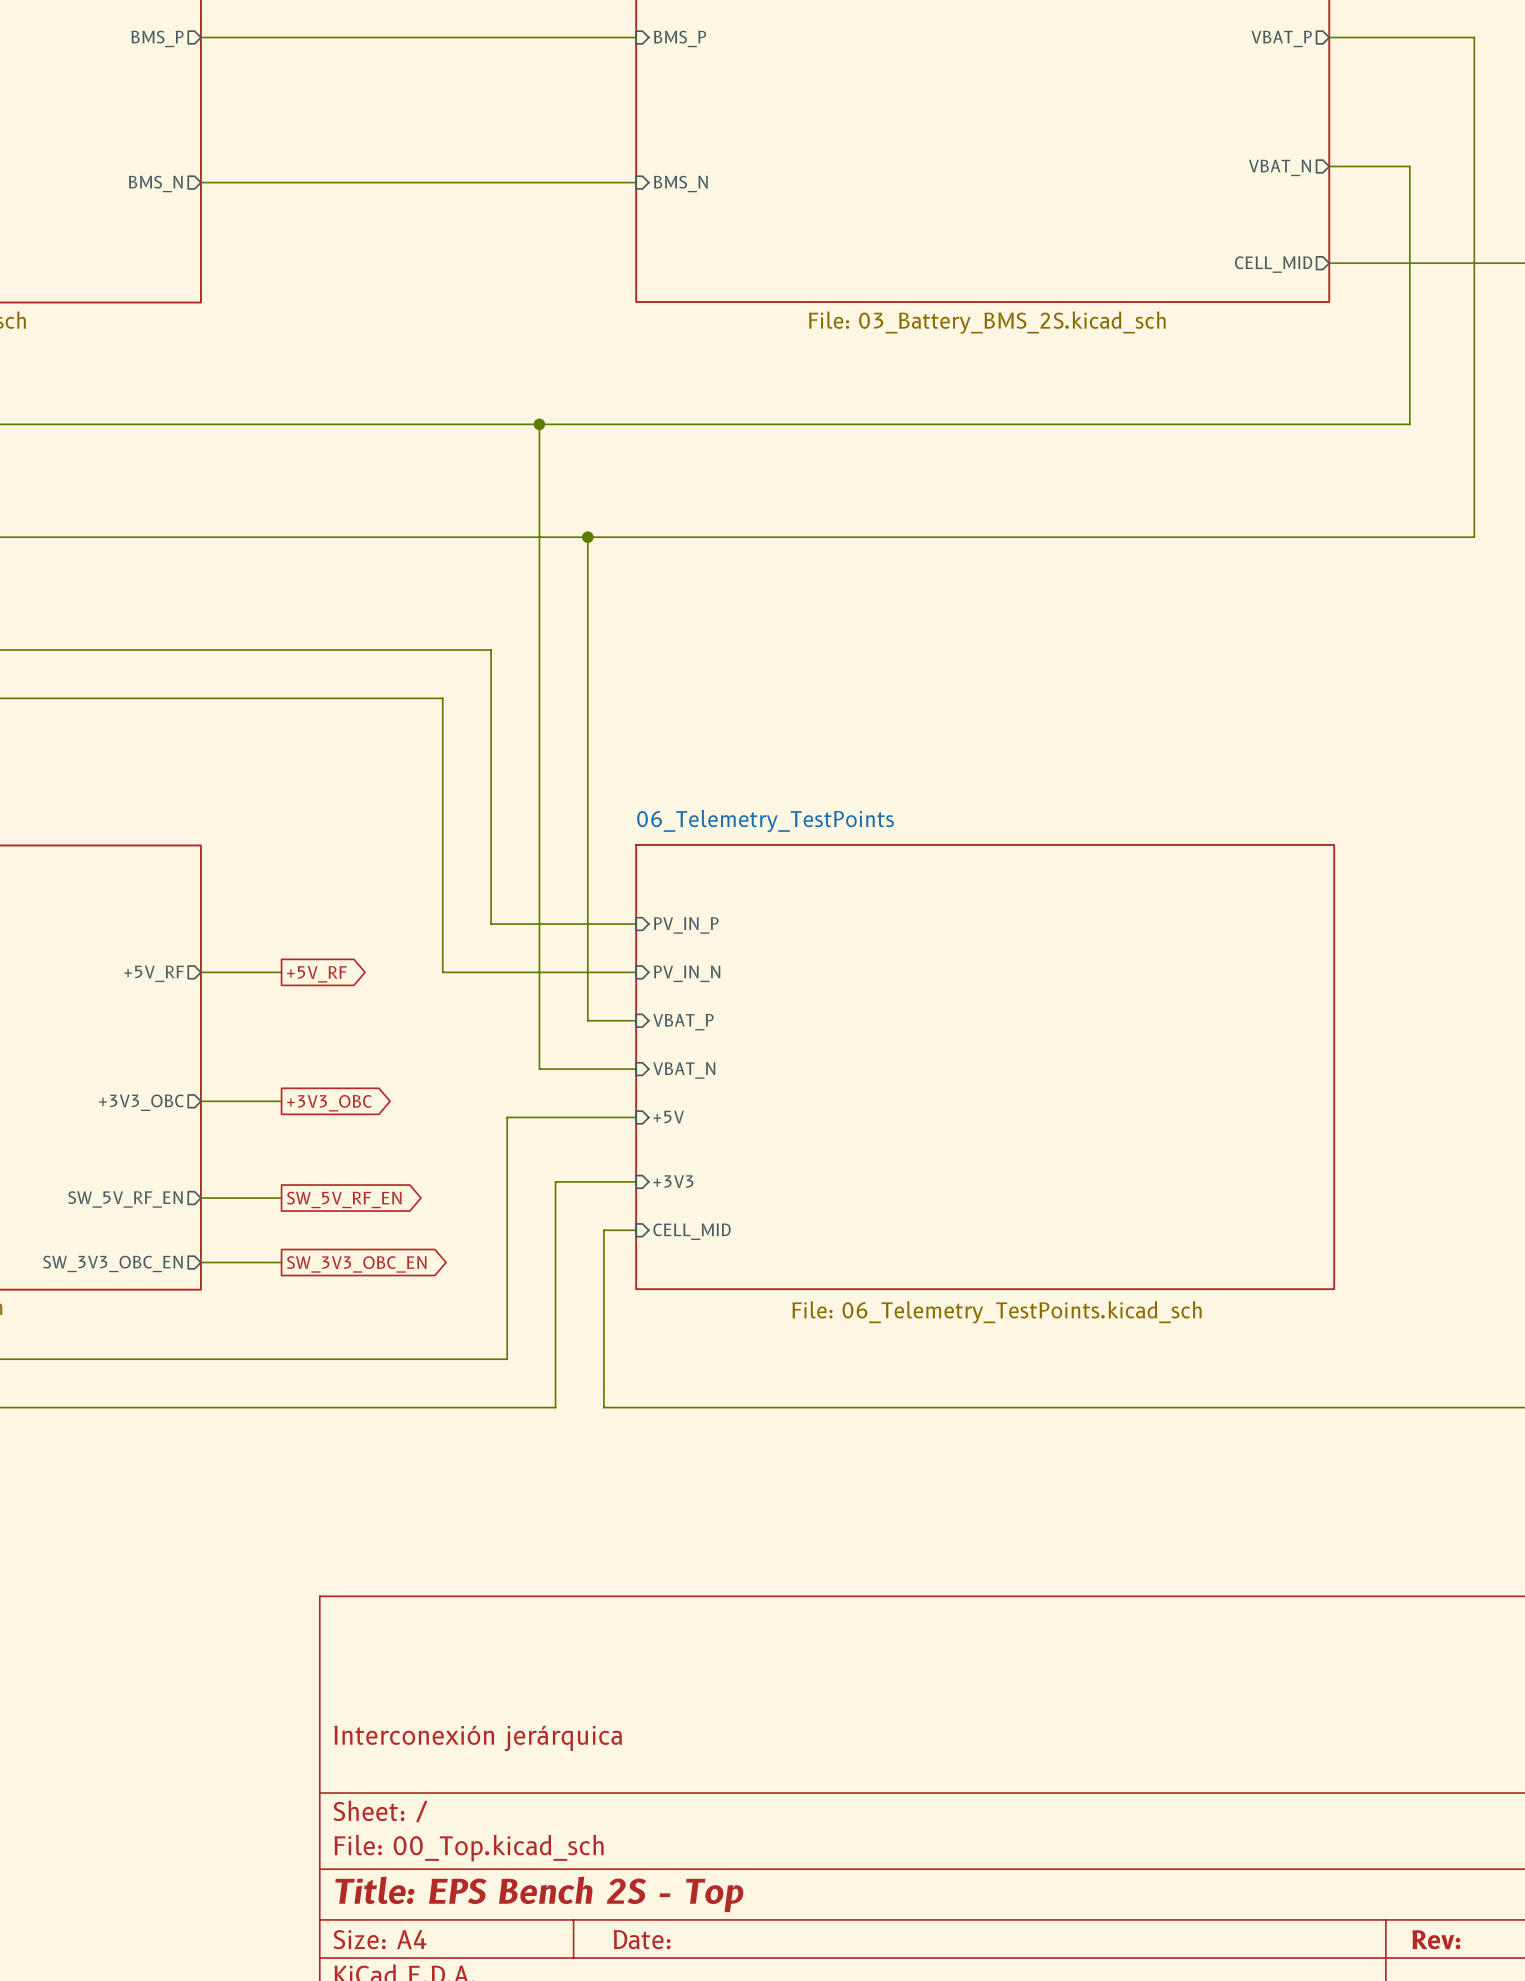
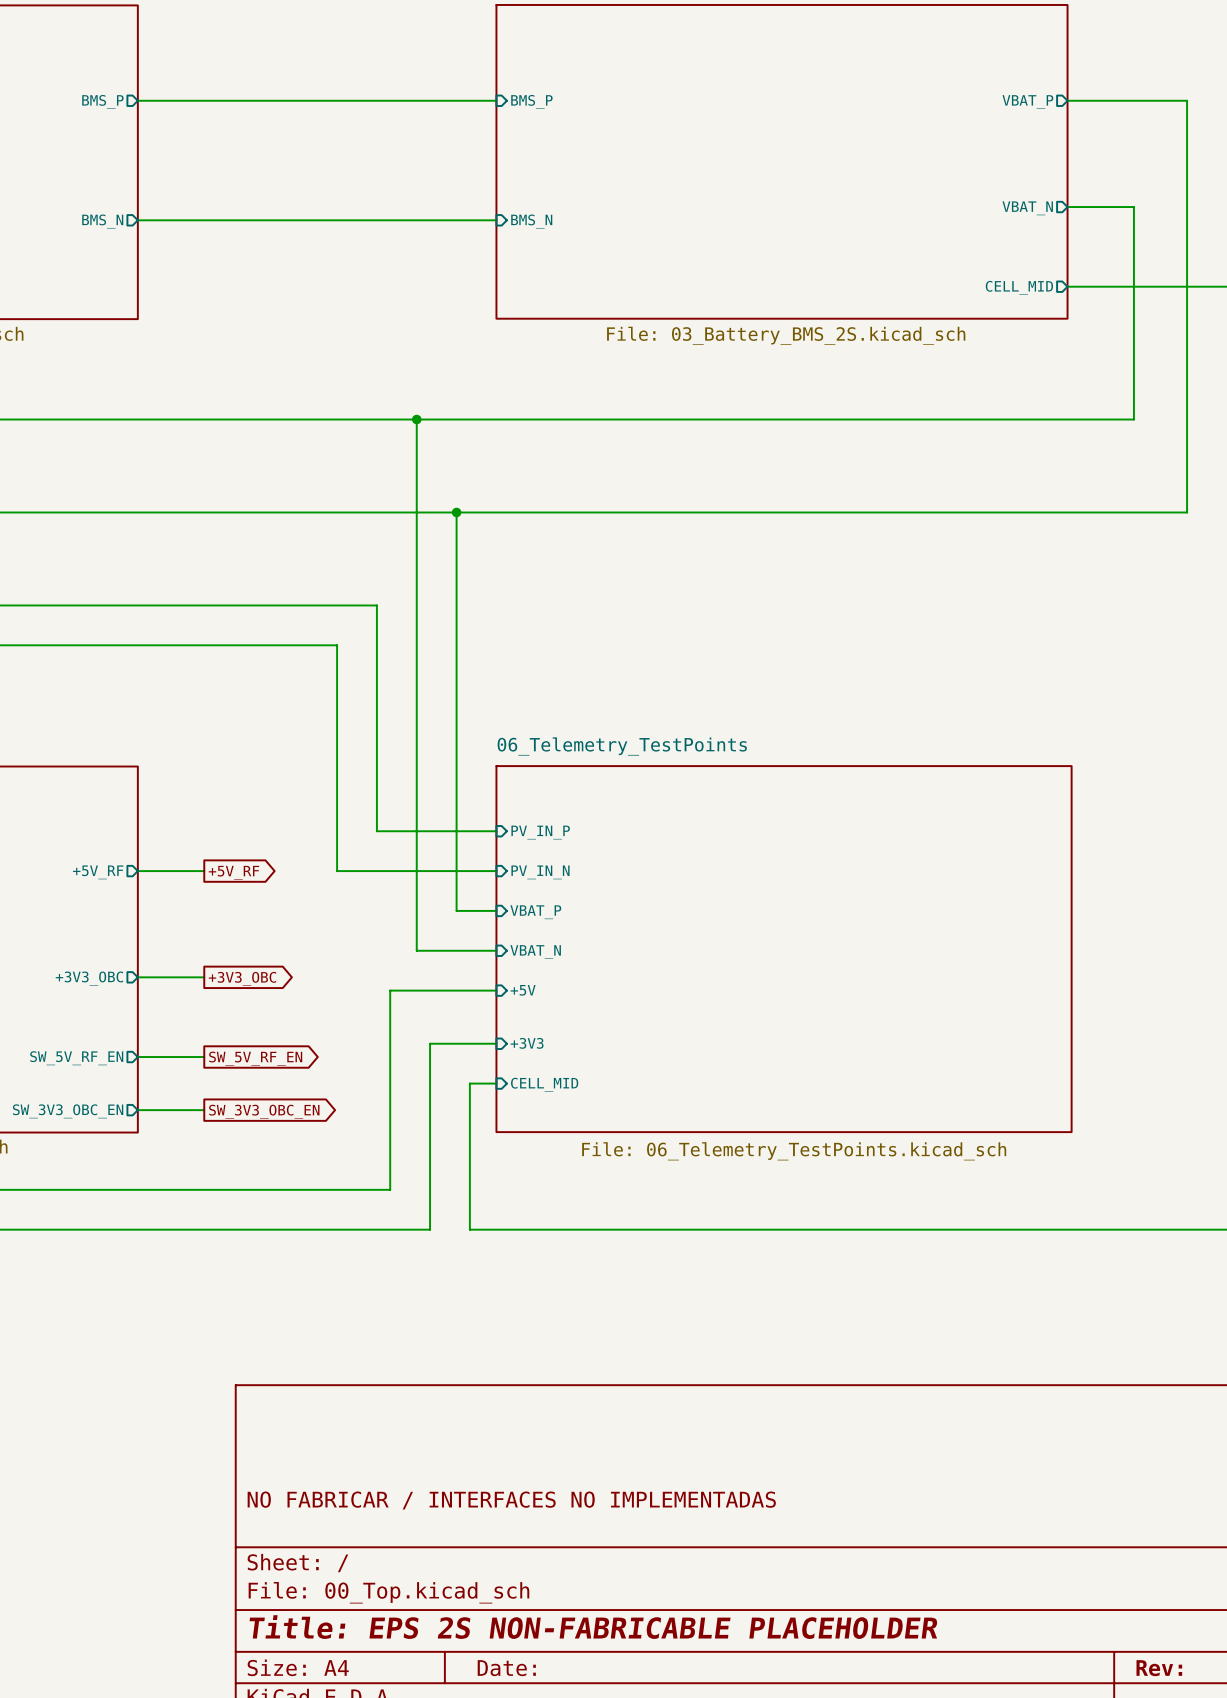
title block: Interconexión jerárquica (478, 1738) -> NO FABRICAR / INTERFACES NO IMPLEMENTADAS (511, 1500)
title block: Title: EPS Bench 2S - Top (539, 1894) -> Title: EPS 2S NON-FABRICABLE PLACEHOLDER (593, 1627)

